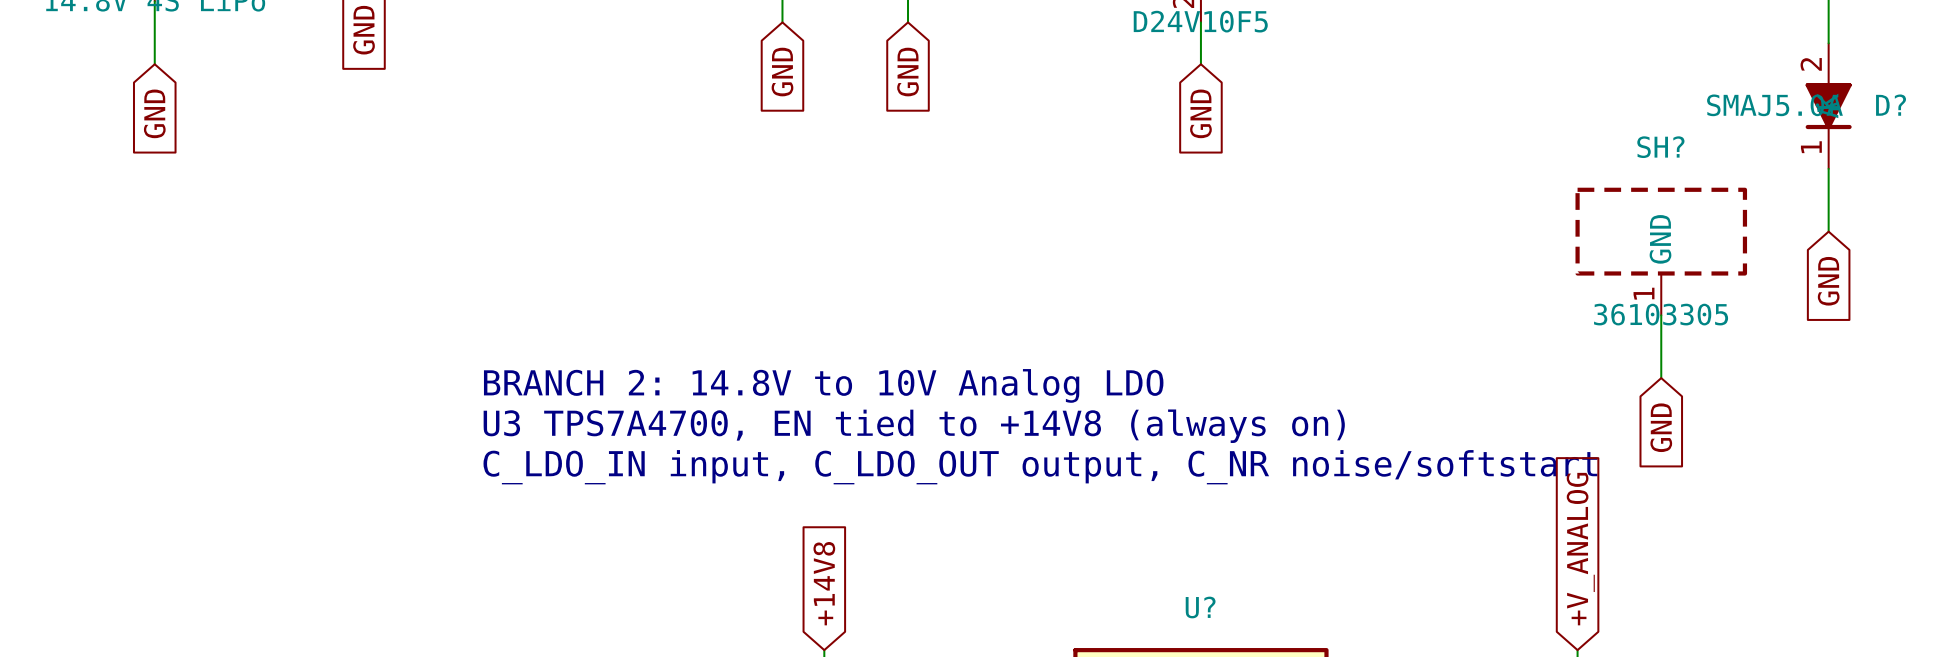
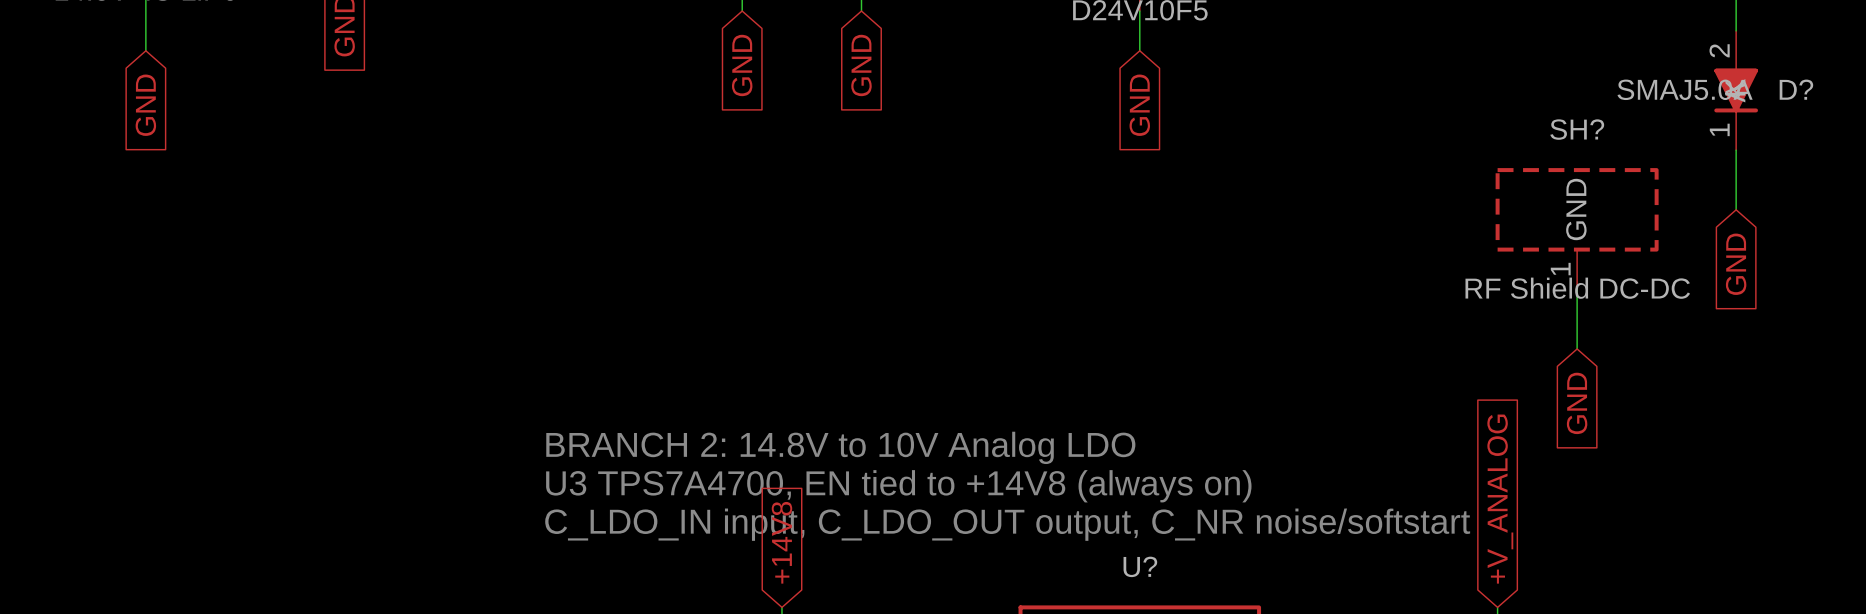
SH? value: 36103305 (1661, 314) -> RF Shield DC-DC (1577, 288)
text position: BRANCH 2: 14.8V to 10V Analog LDO (823, 385) -> BRANCH 2: 14.8V to 10V Analog LDO (840, 447)
text position: U3 TPS7A4700, EN tied to +14V8 (always on) (914, 426) -> U3 TPS7A4700, EN tied to +14V8 (always on) (898, 486)
text position: C_LDO_IN input, C_LDO_OUT output, C_NR noise/softstart (1040, 467) -> C_LDO_IN input, C_LDO_OUT output, C_NR noise/softstart (1007, 524)

